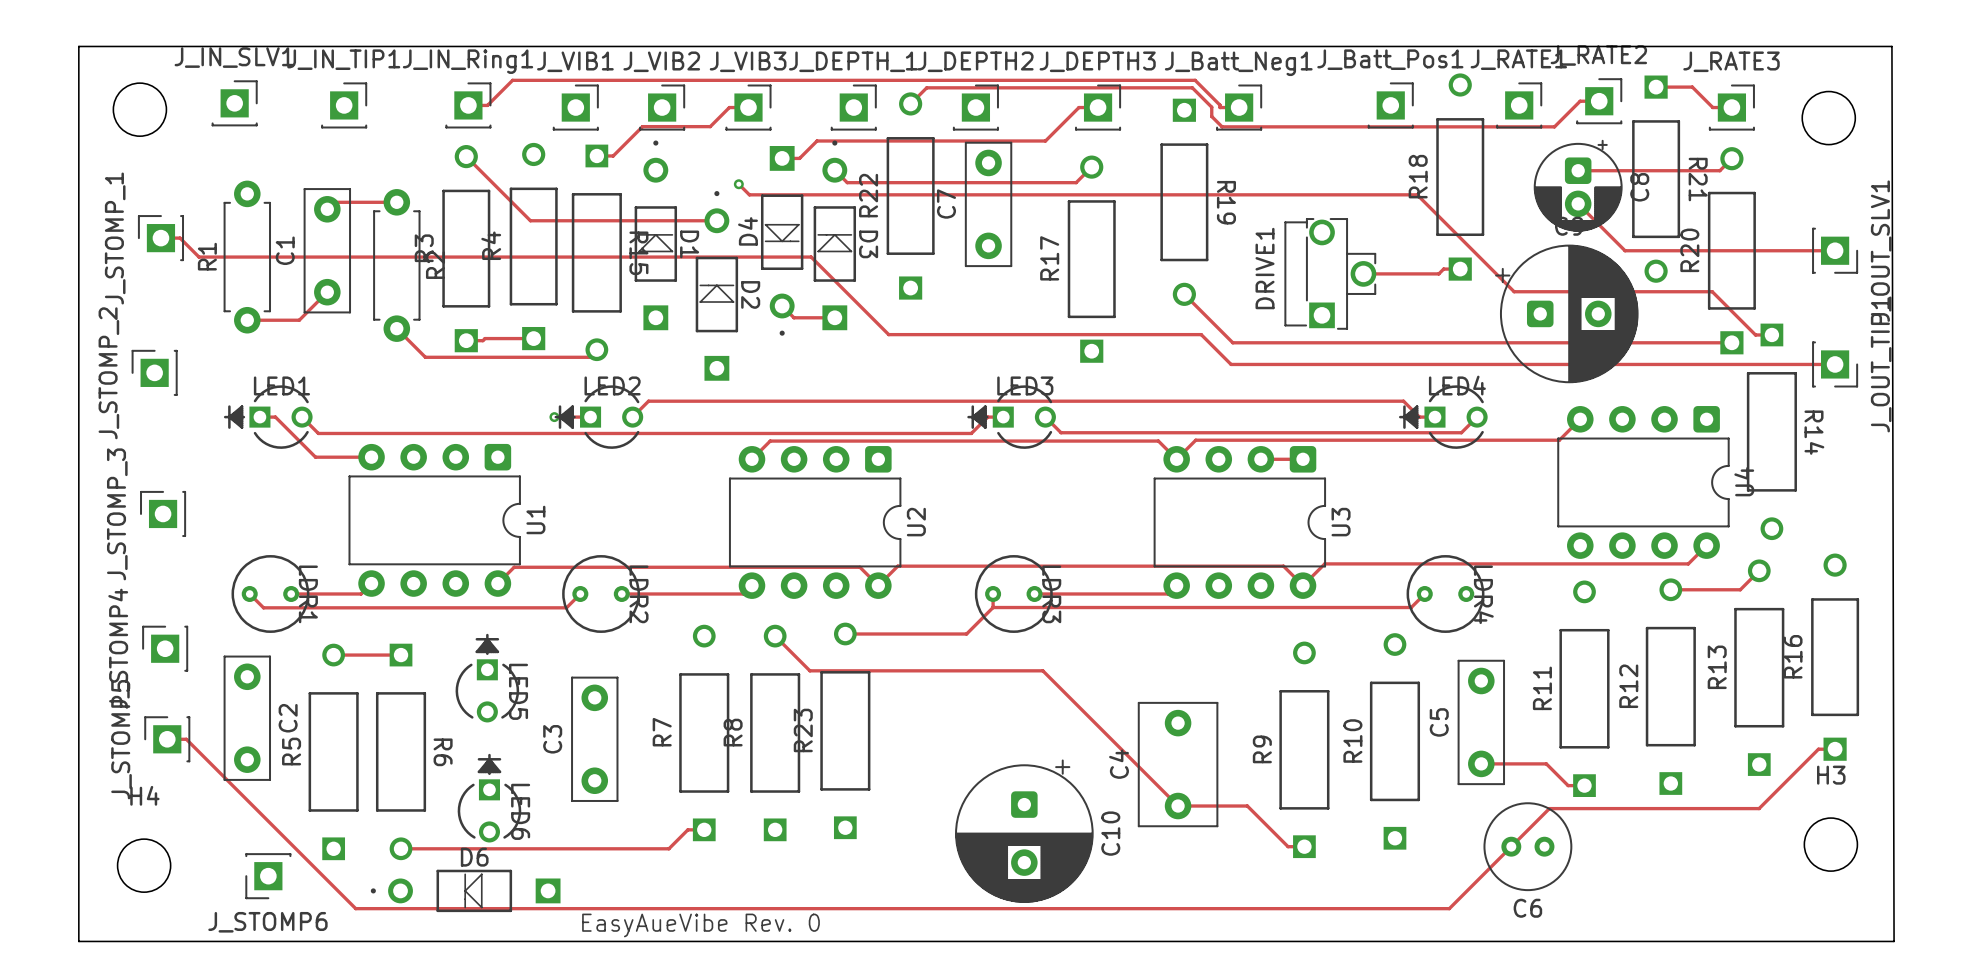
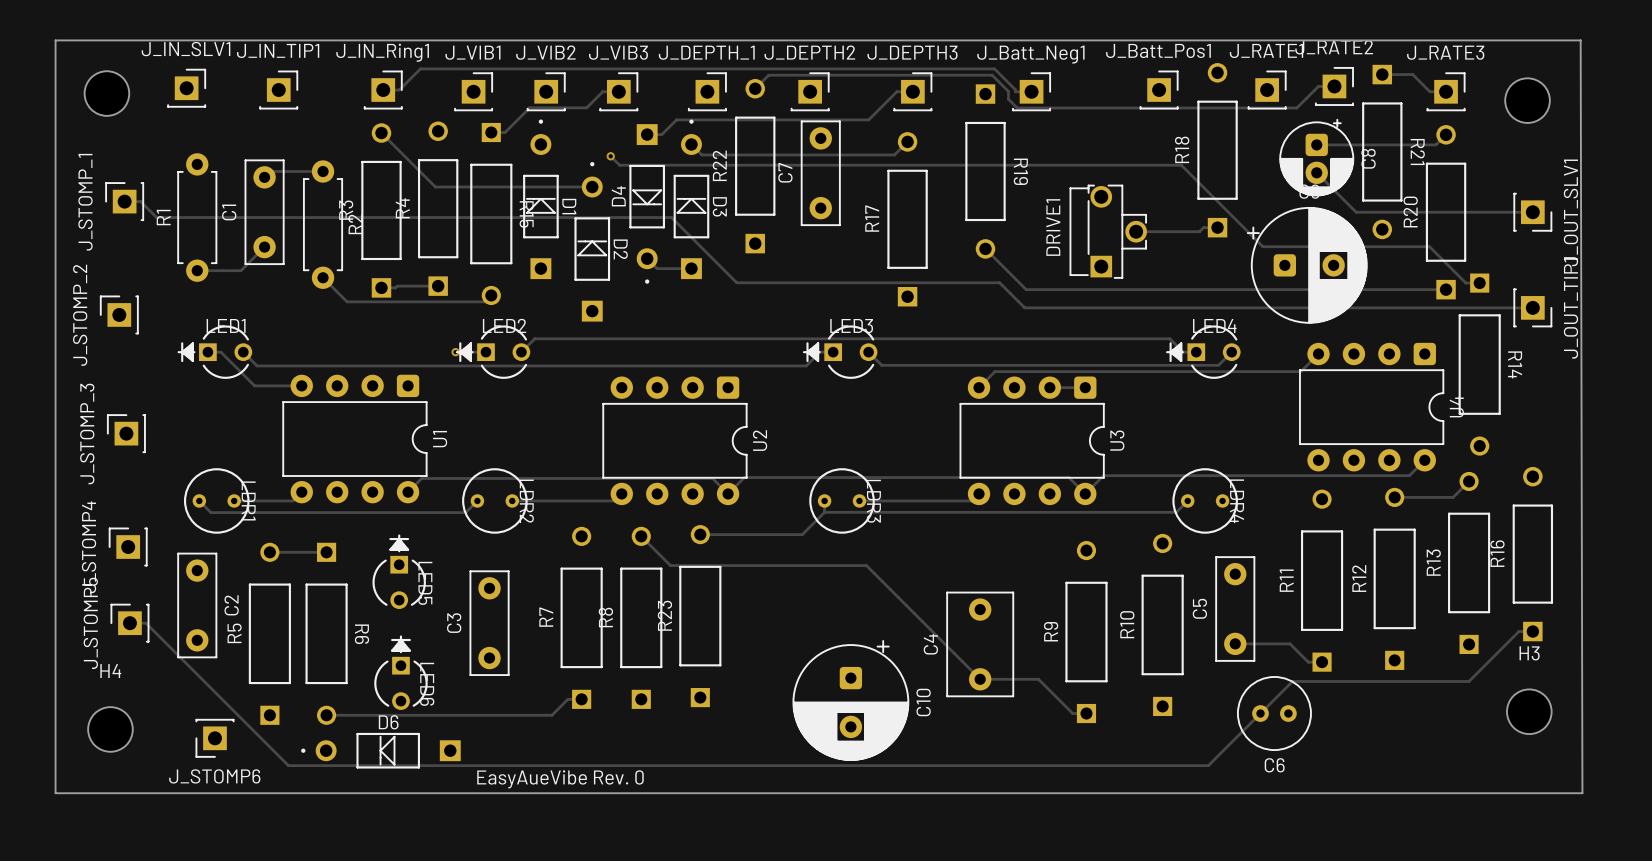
track: (751, 459) (770, 441) (1158, 441) (1176, 459) -> none

